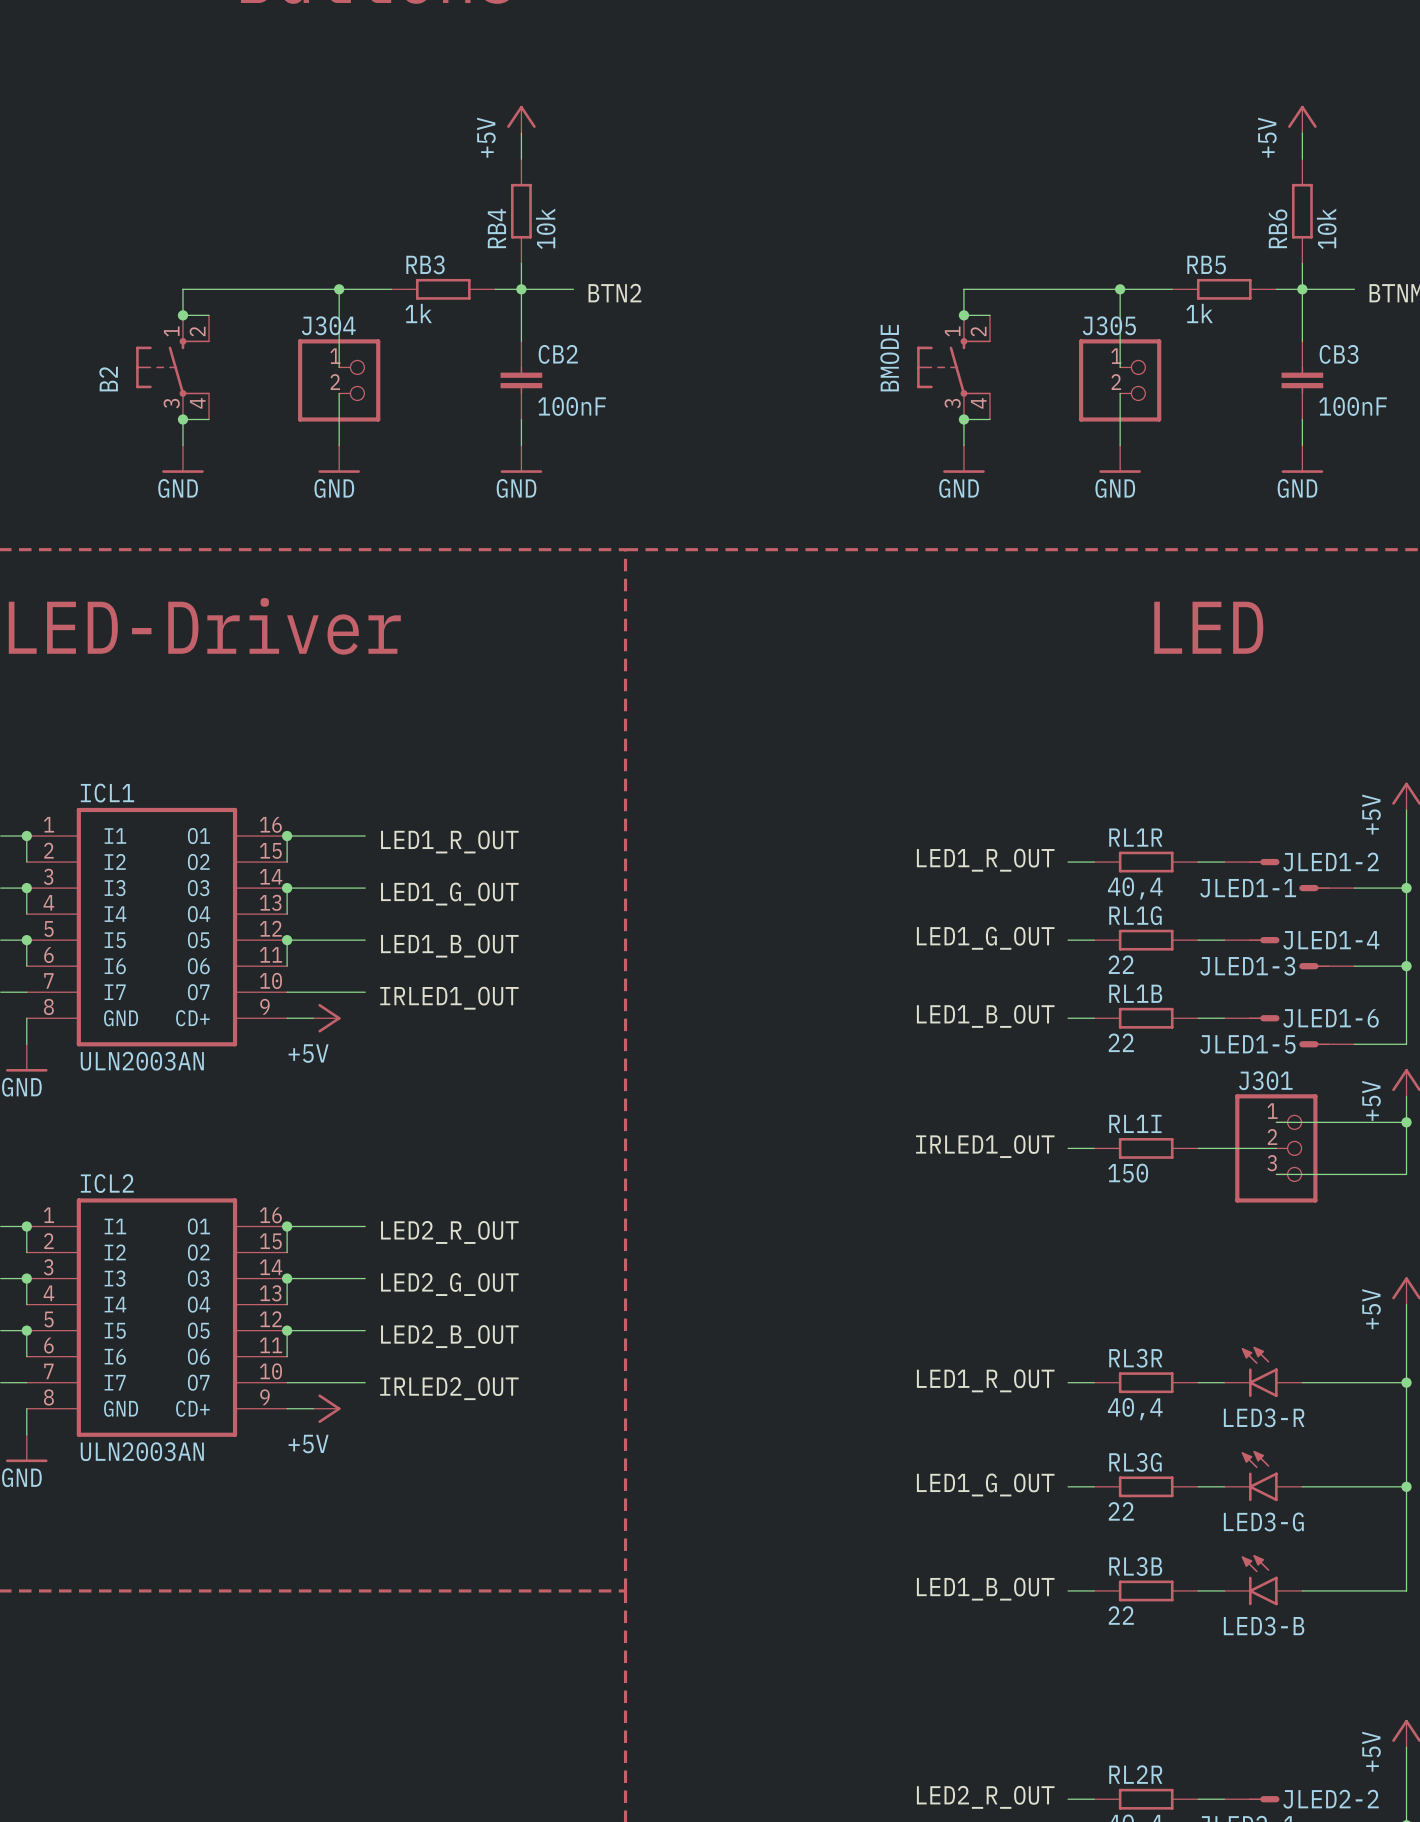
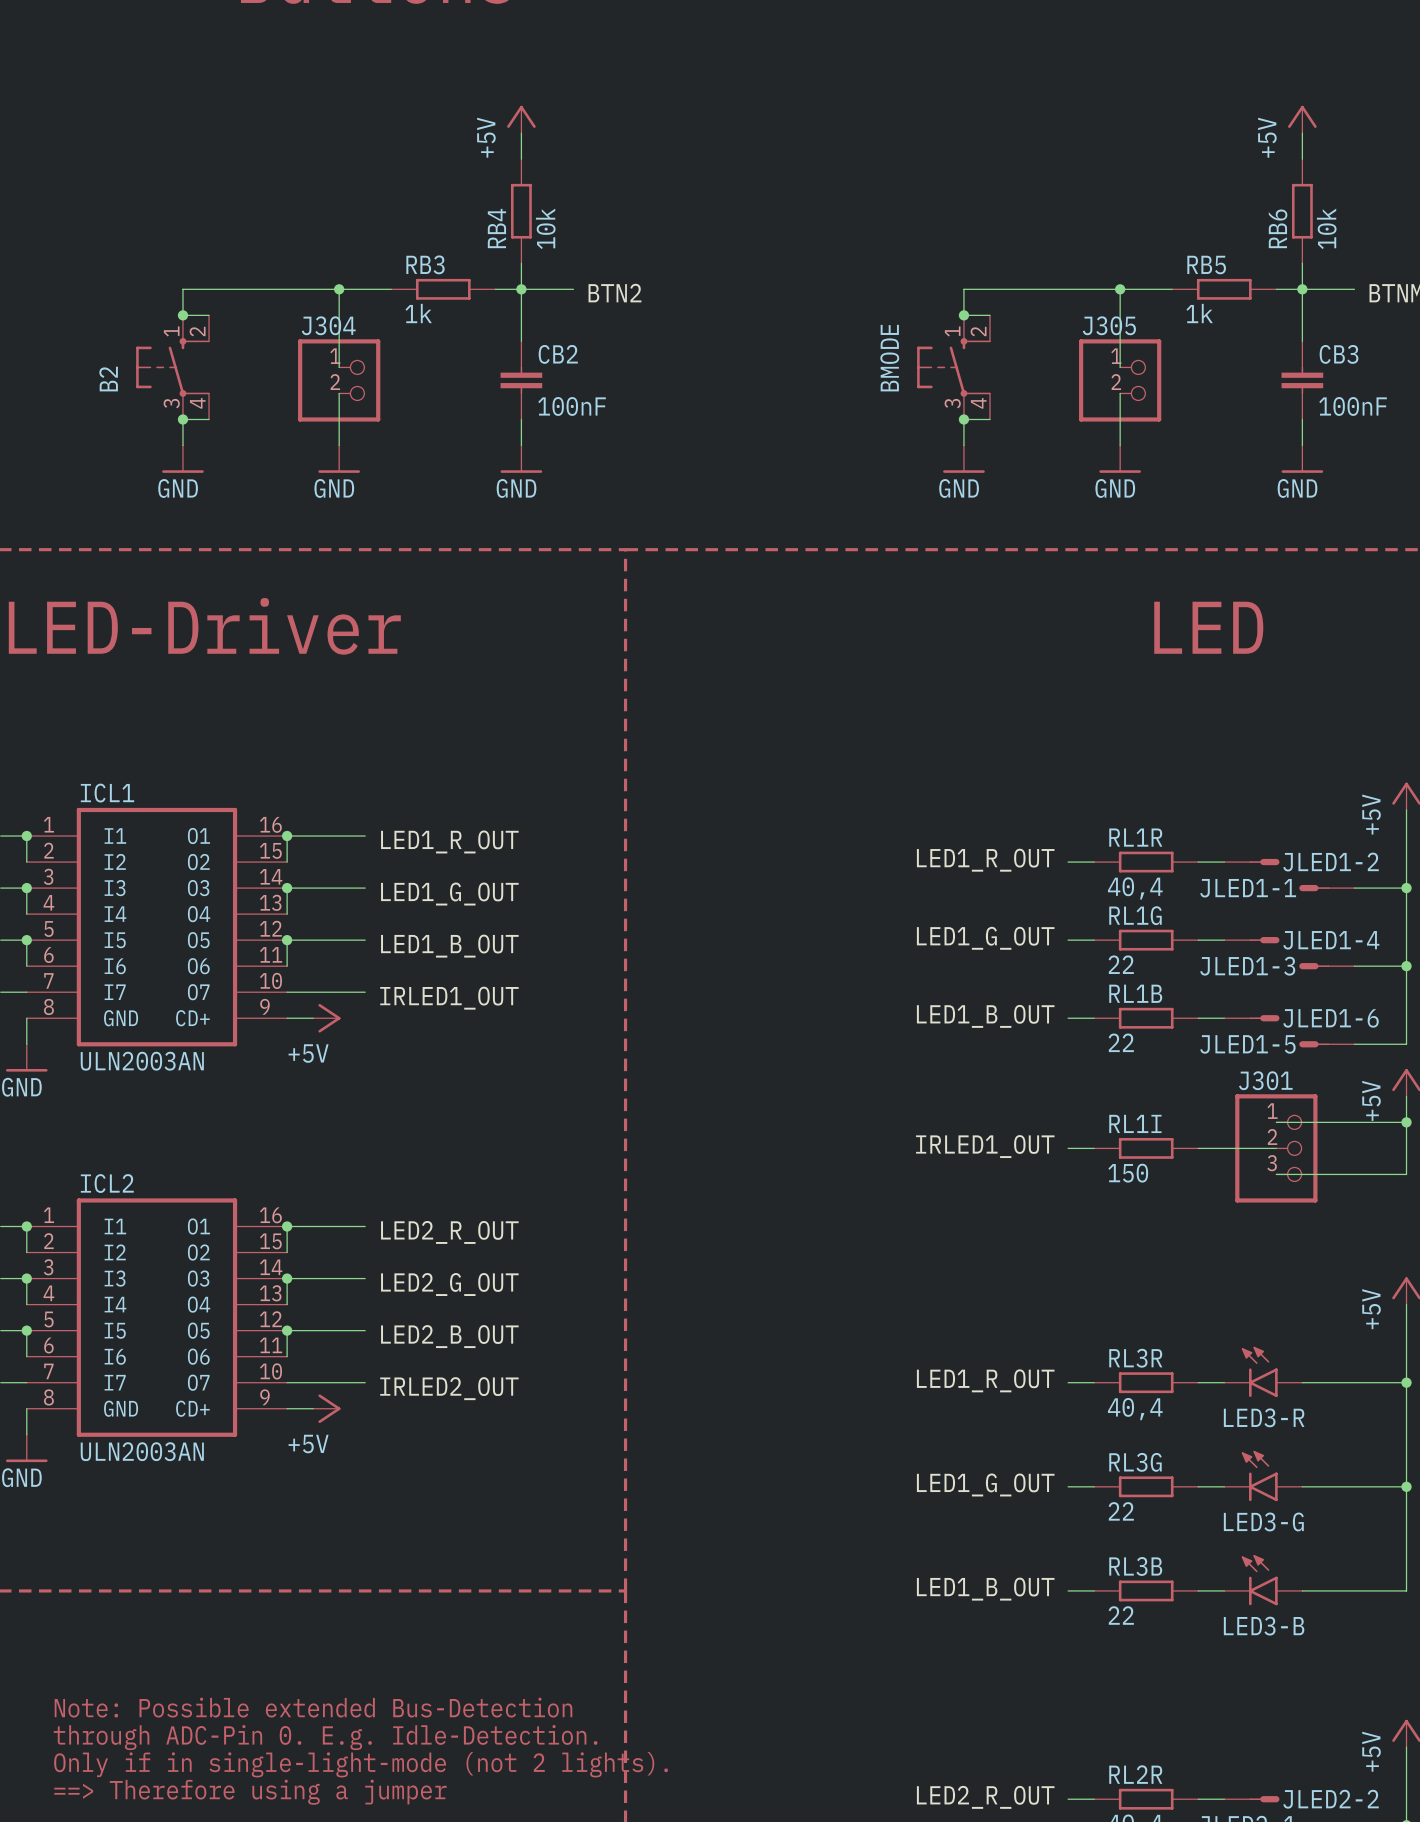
text: none -> Note: Possible extended Bus-Detection (313, 1707)
text: none -> through ADC-Pin 0. E.g. Idle-Detection. (325, 1737)
text: none -> Only if in single-light-mode (not 2 lights). (360, 1764)
text: none -> ==> Therefore using a jumper (250, 1792)

